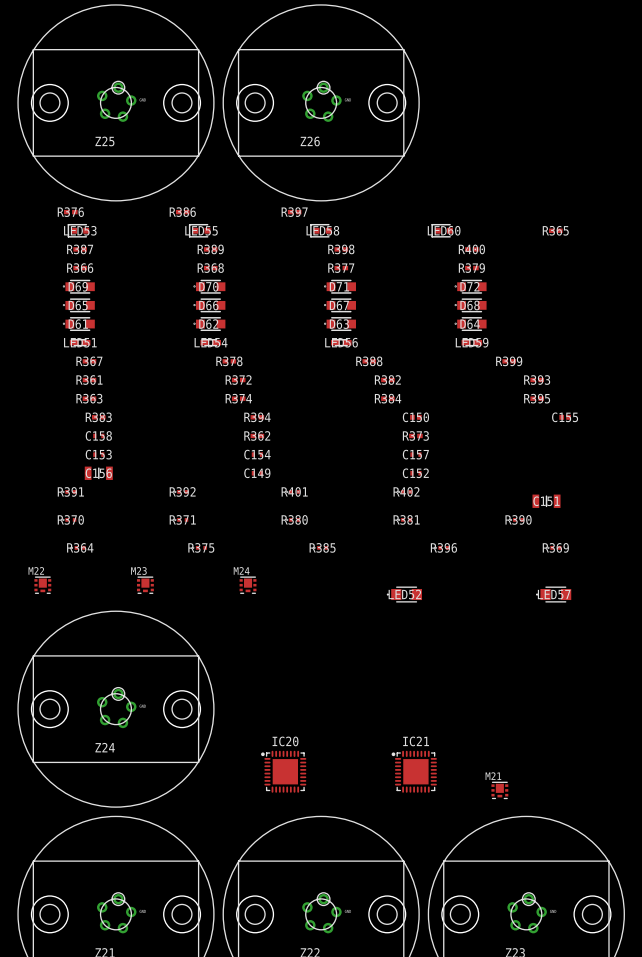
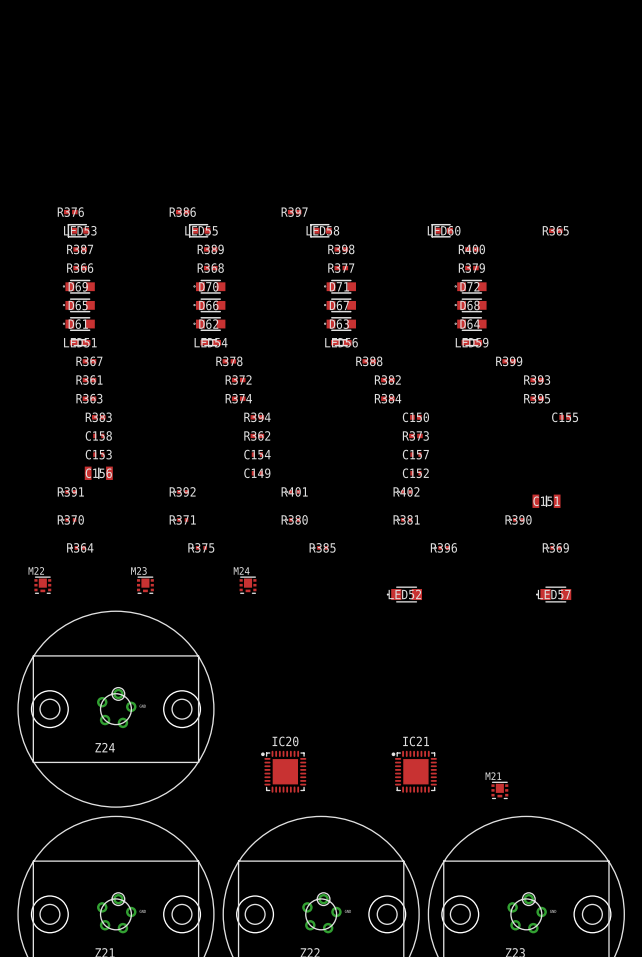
Z25: (115, 102) -> none
Z26: (321, 102) -> none

